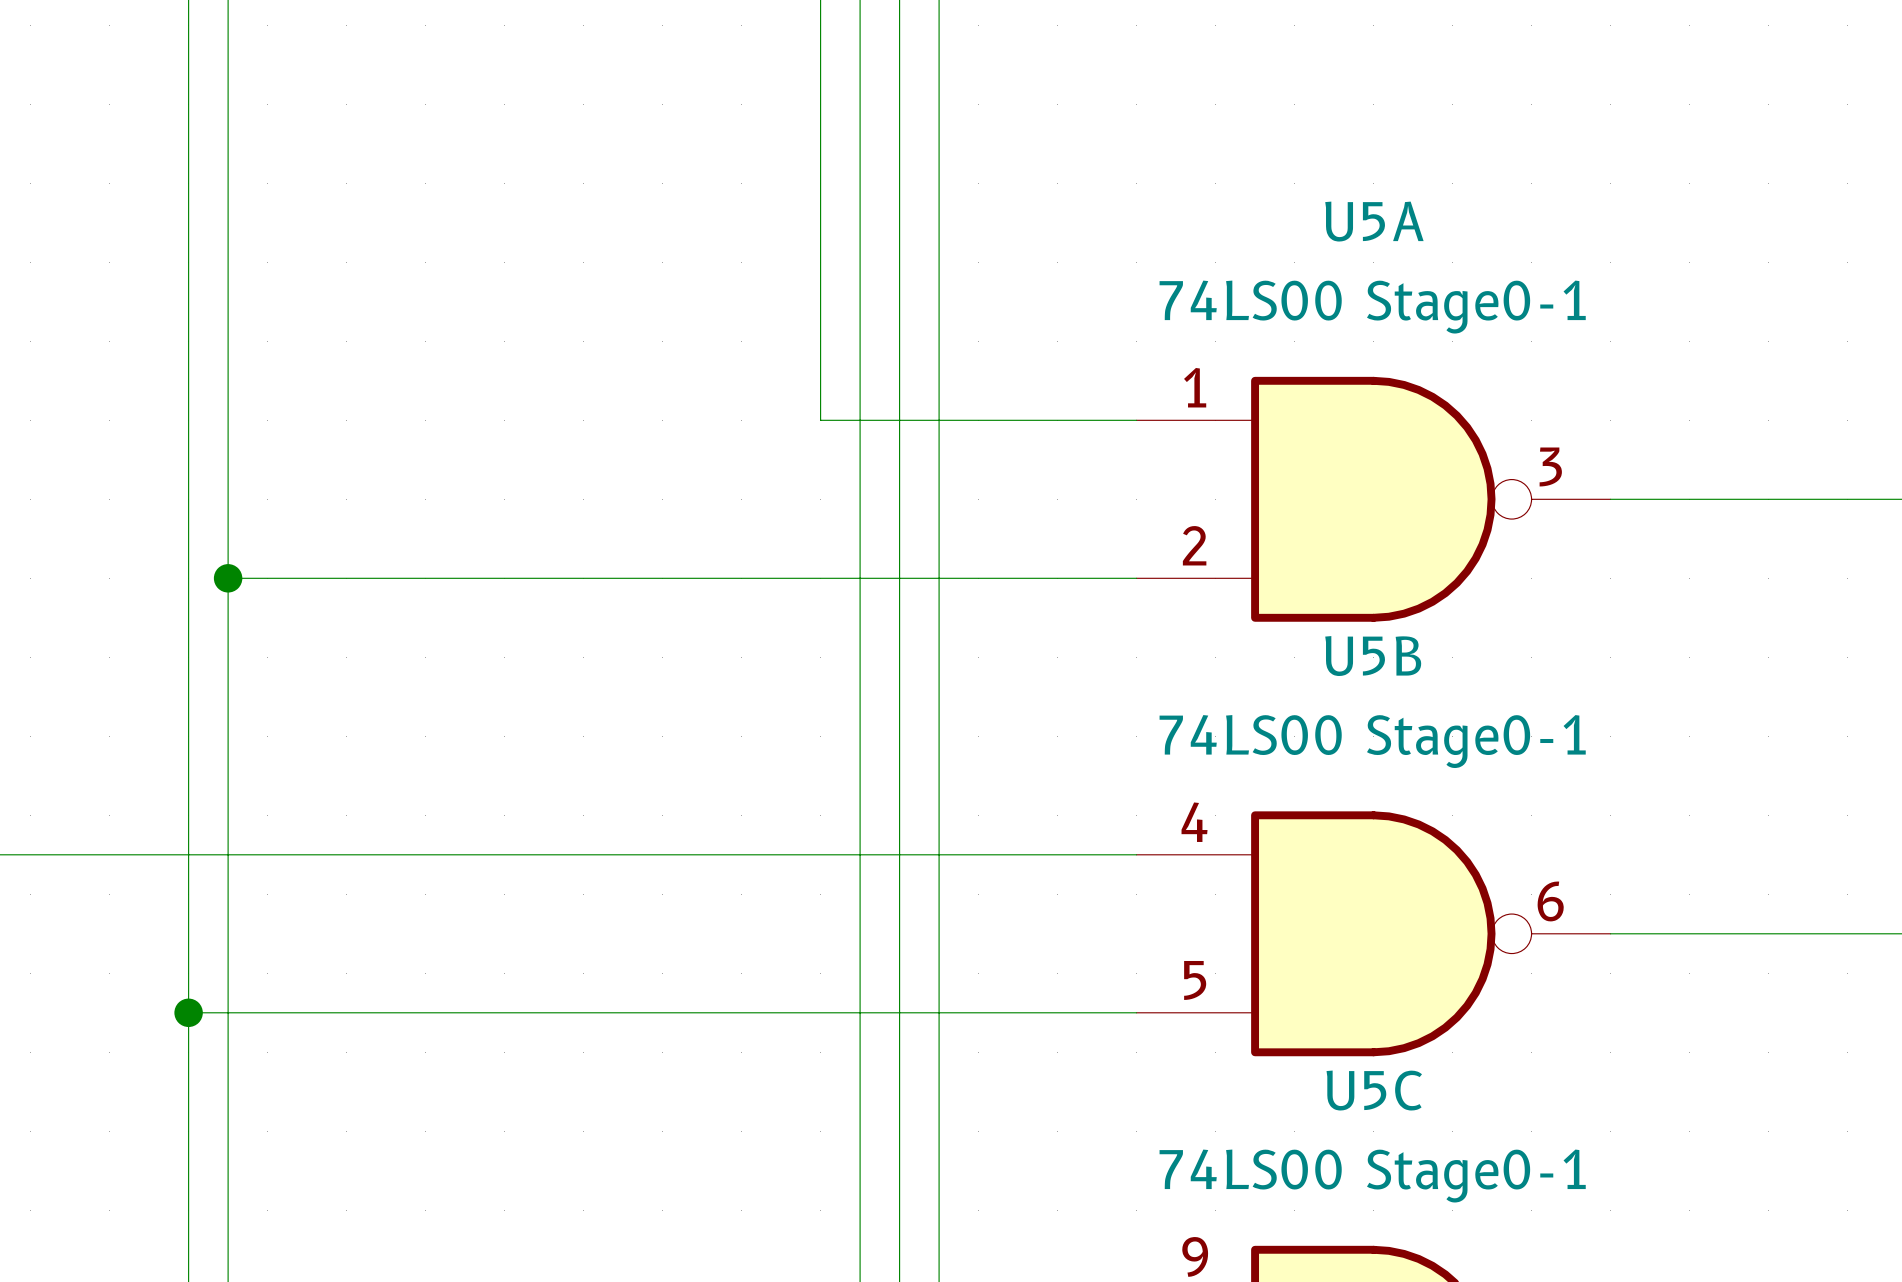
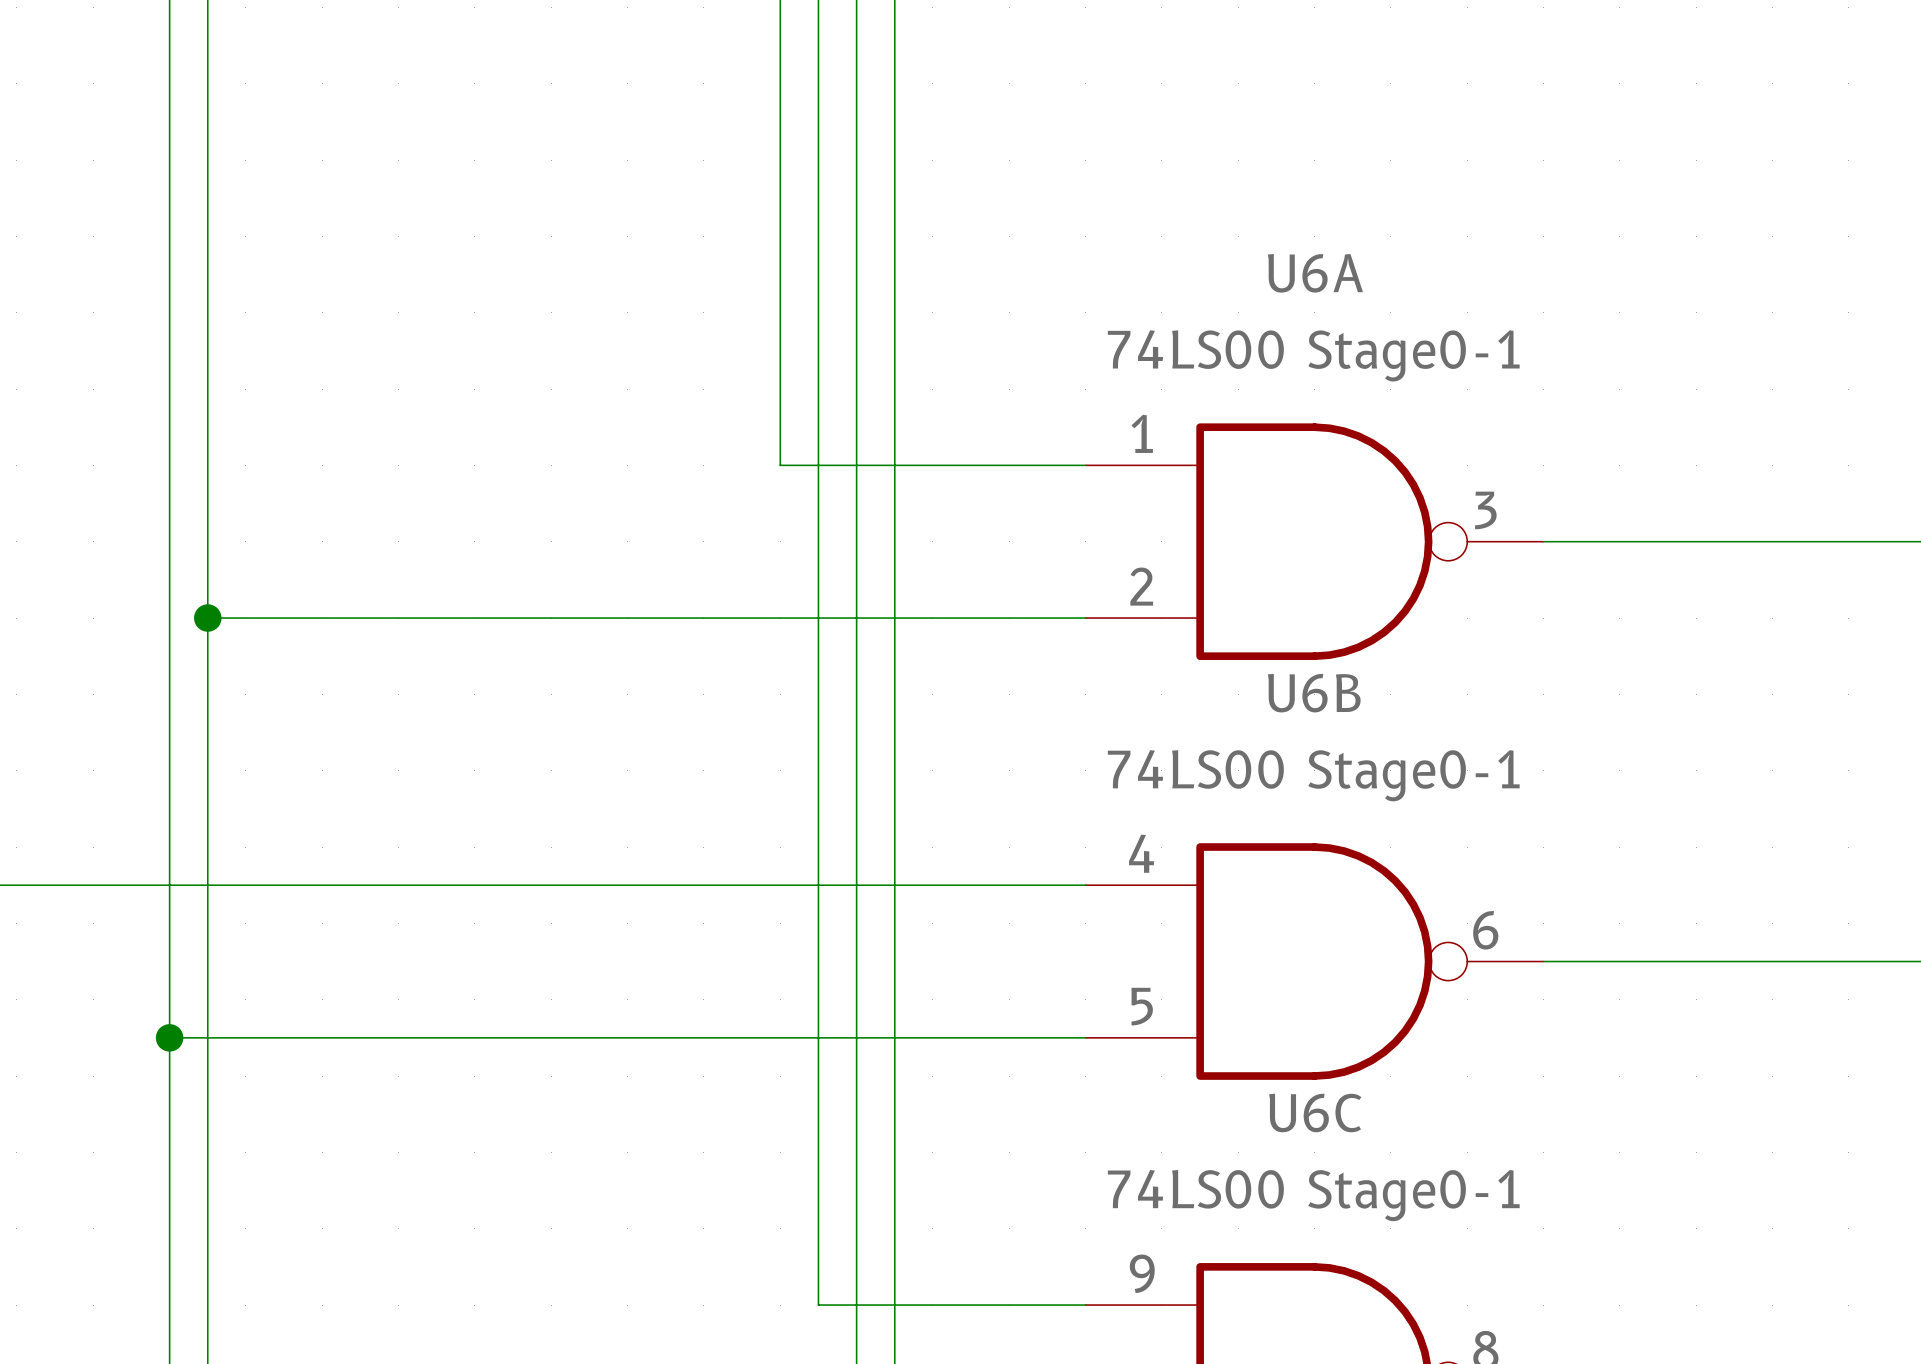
U5A name: U5A (1374, 221) -> U6A (1315, 273)
U5B name: U5B (1373, 656) -> U6B (1314, 693)
U5C name: U5C (1374, 1090) -> U6C (1315, 1112)

